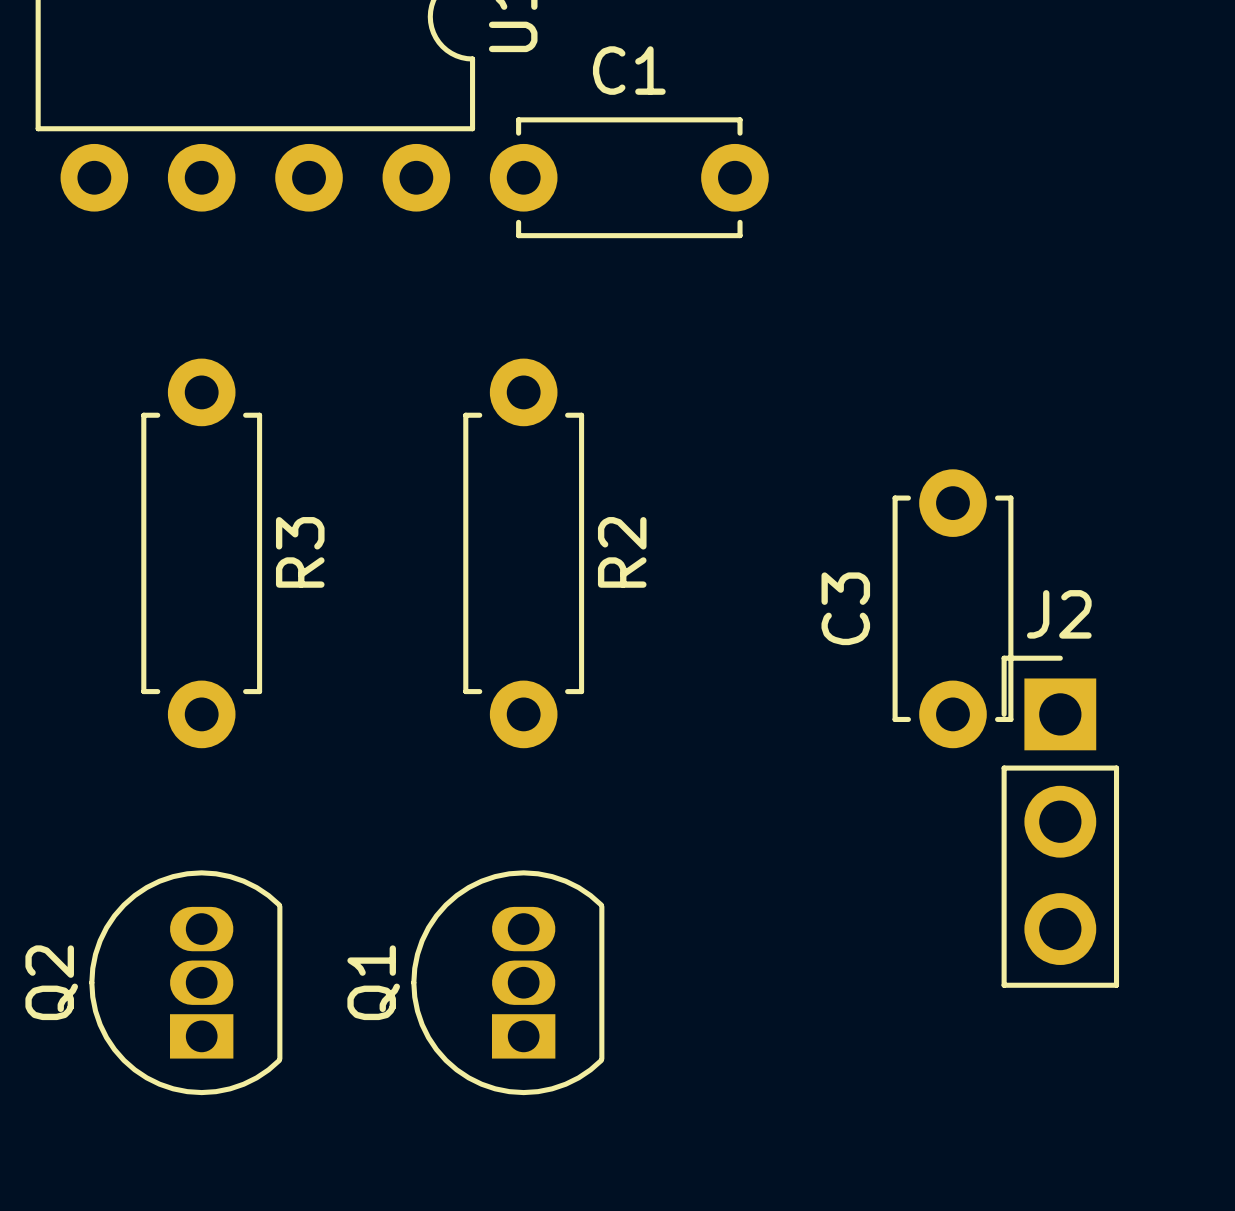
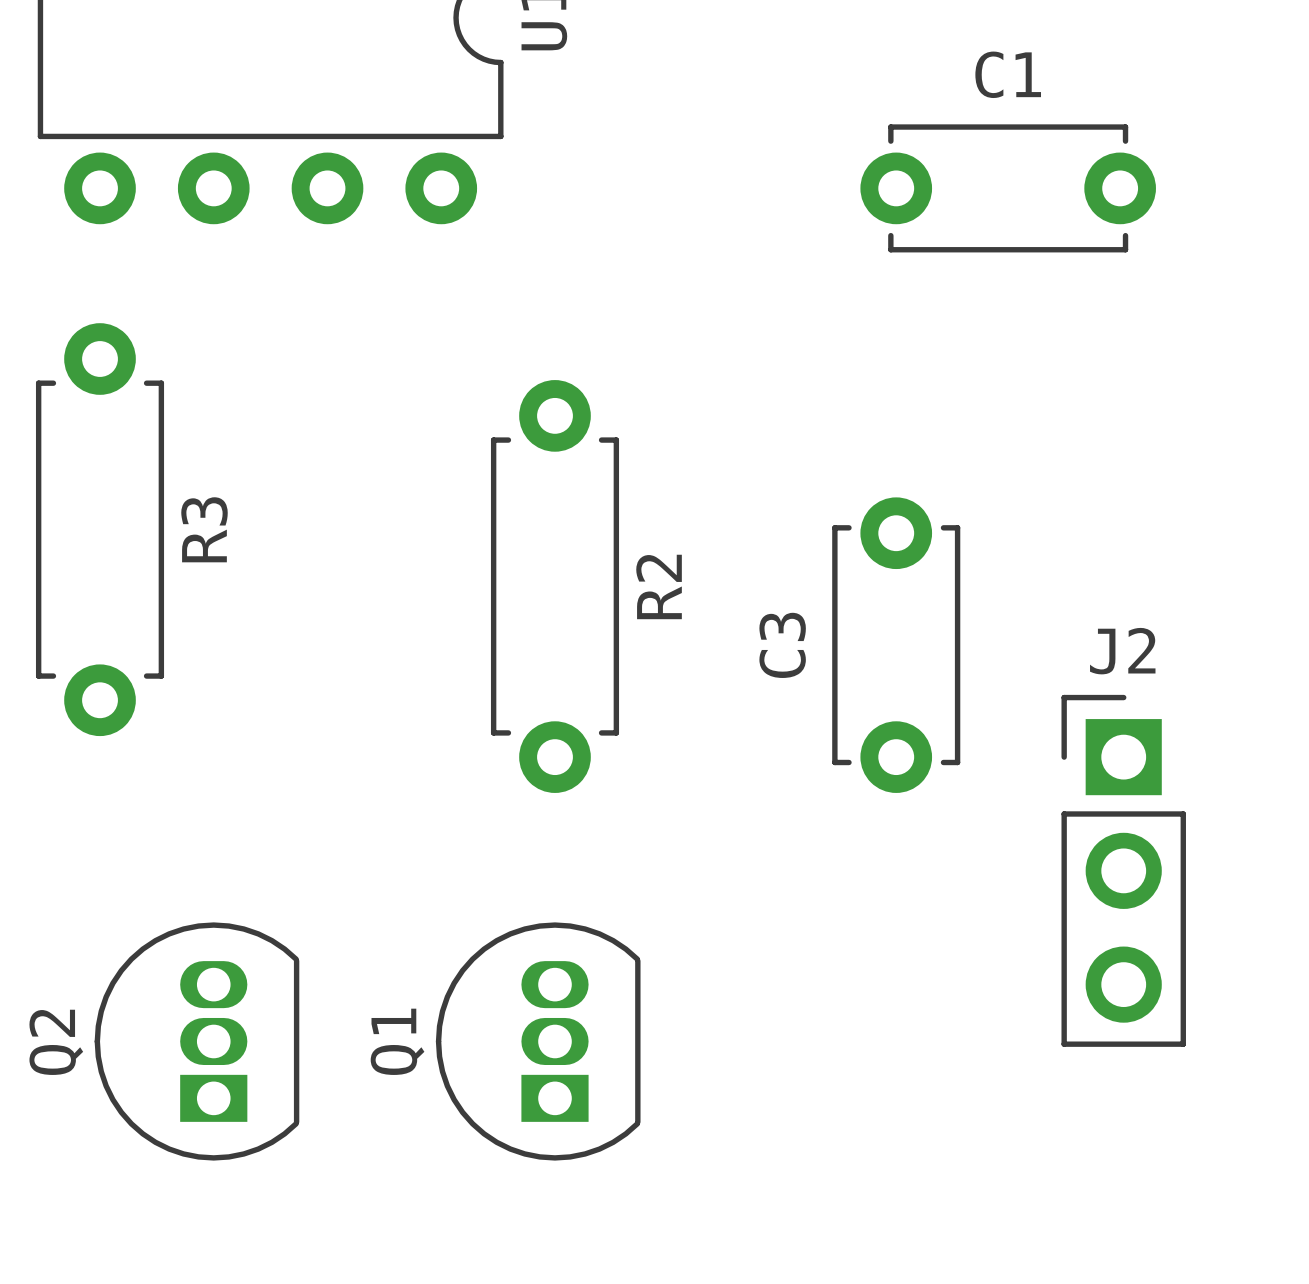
C1 position: (629, 177) -> (1008, 188)
R3 position: (201, 553) -> (100, 529)
C3 position: (952, 608) -> (896, 645)

